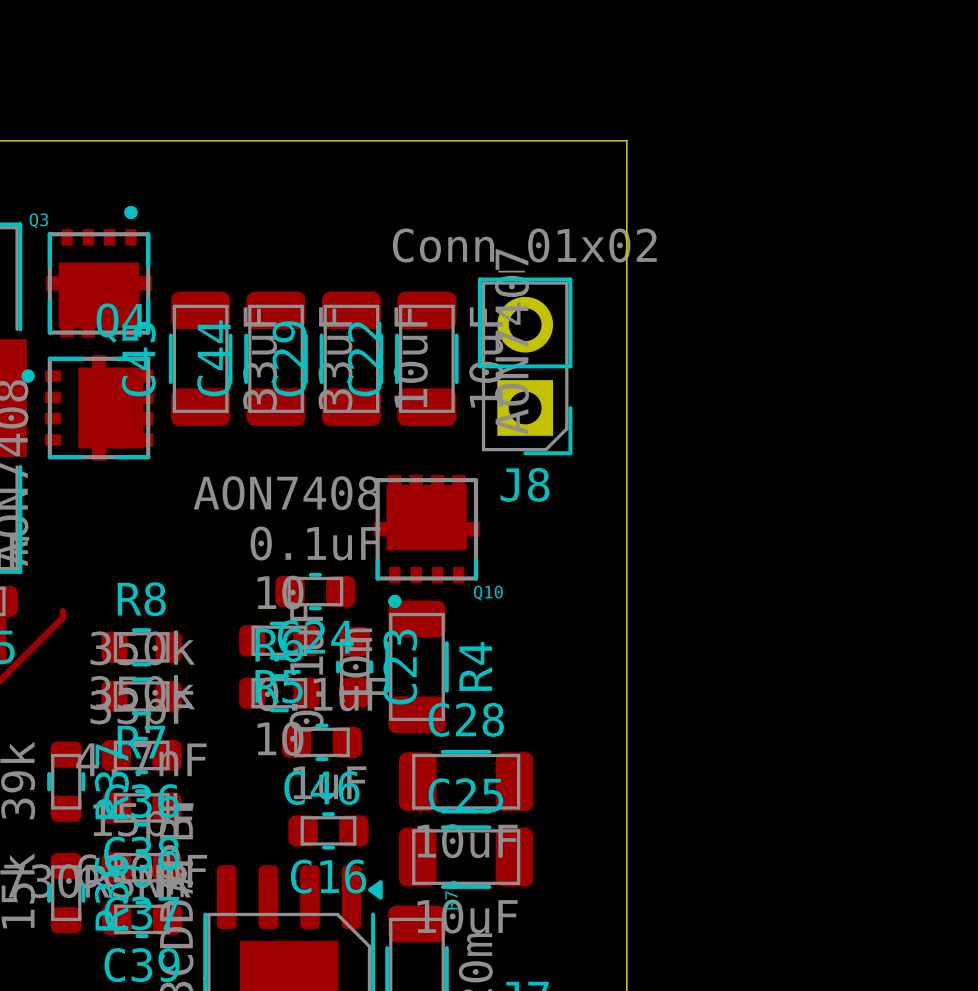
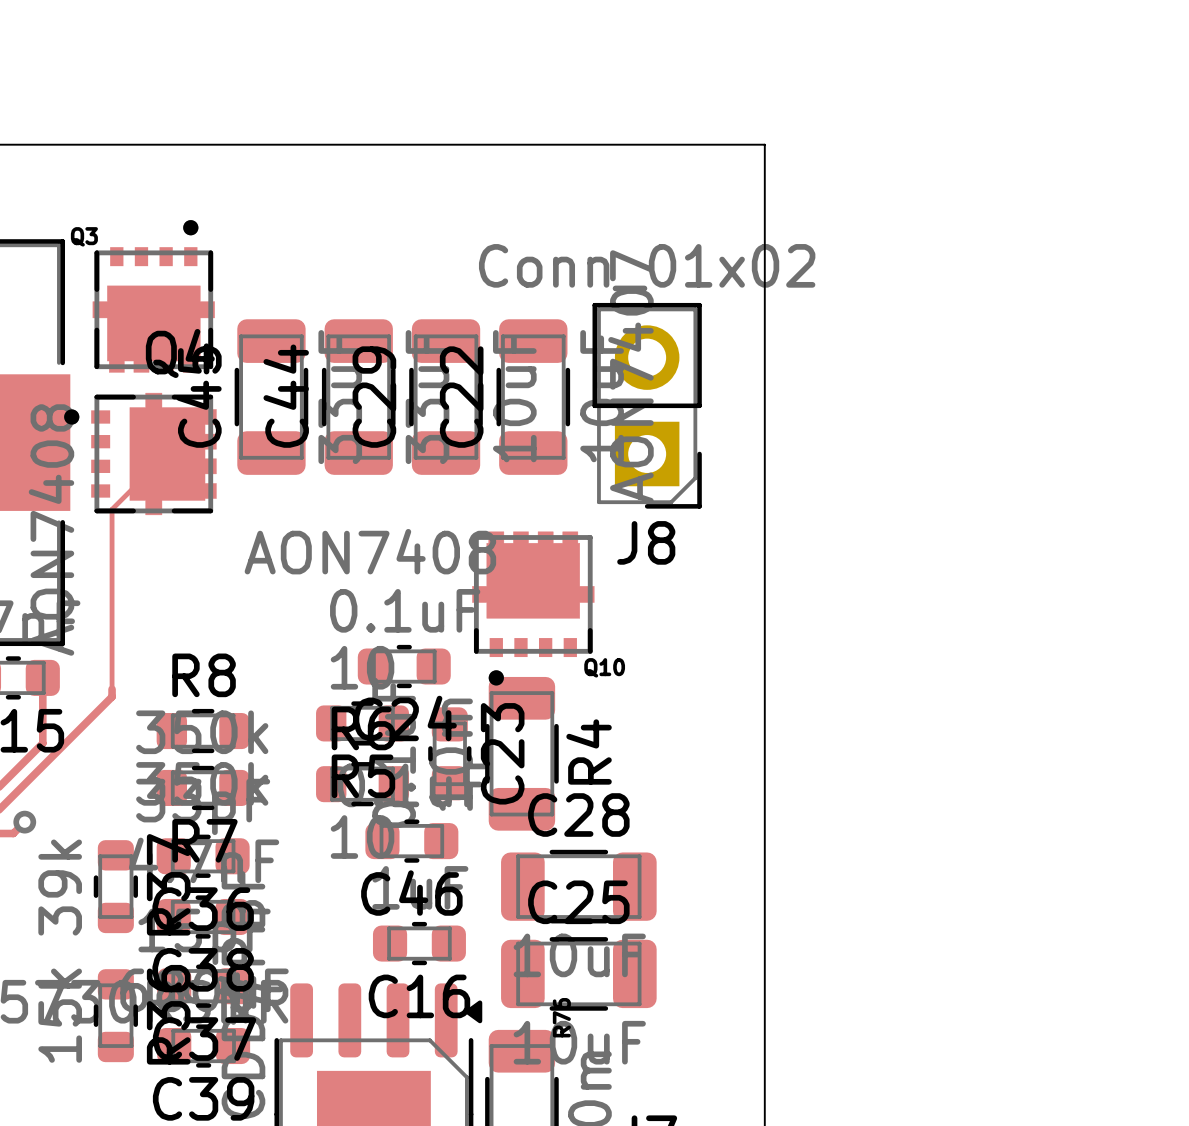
track: none -> (167, 453) (112, 509) (112, 689)

